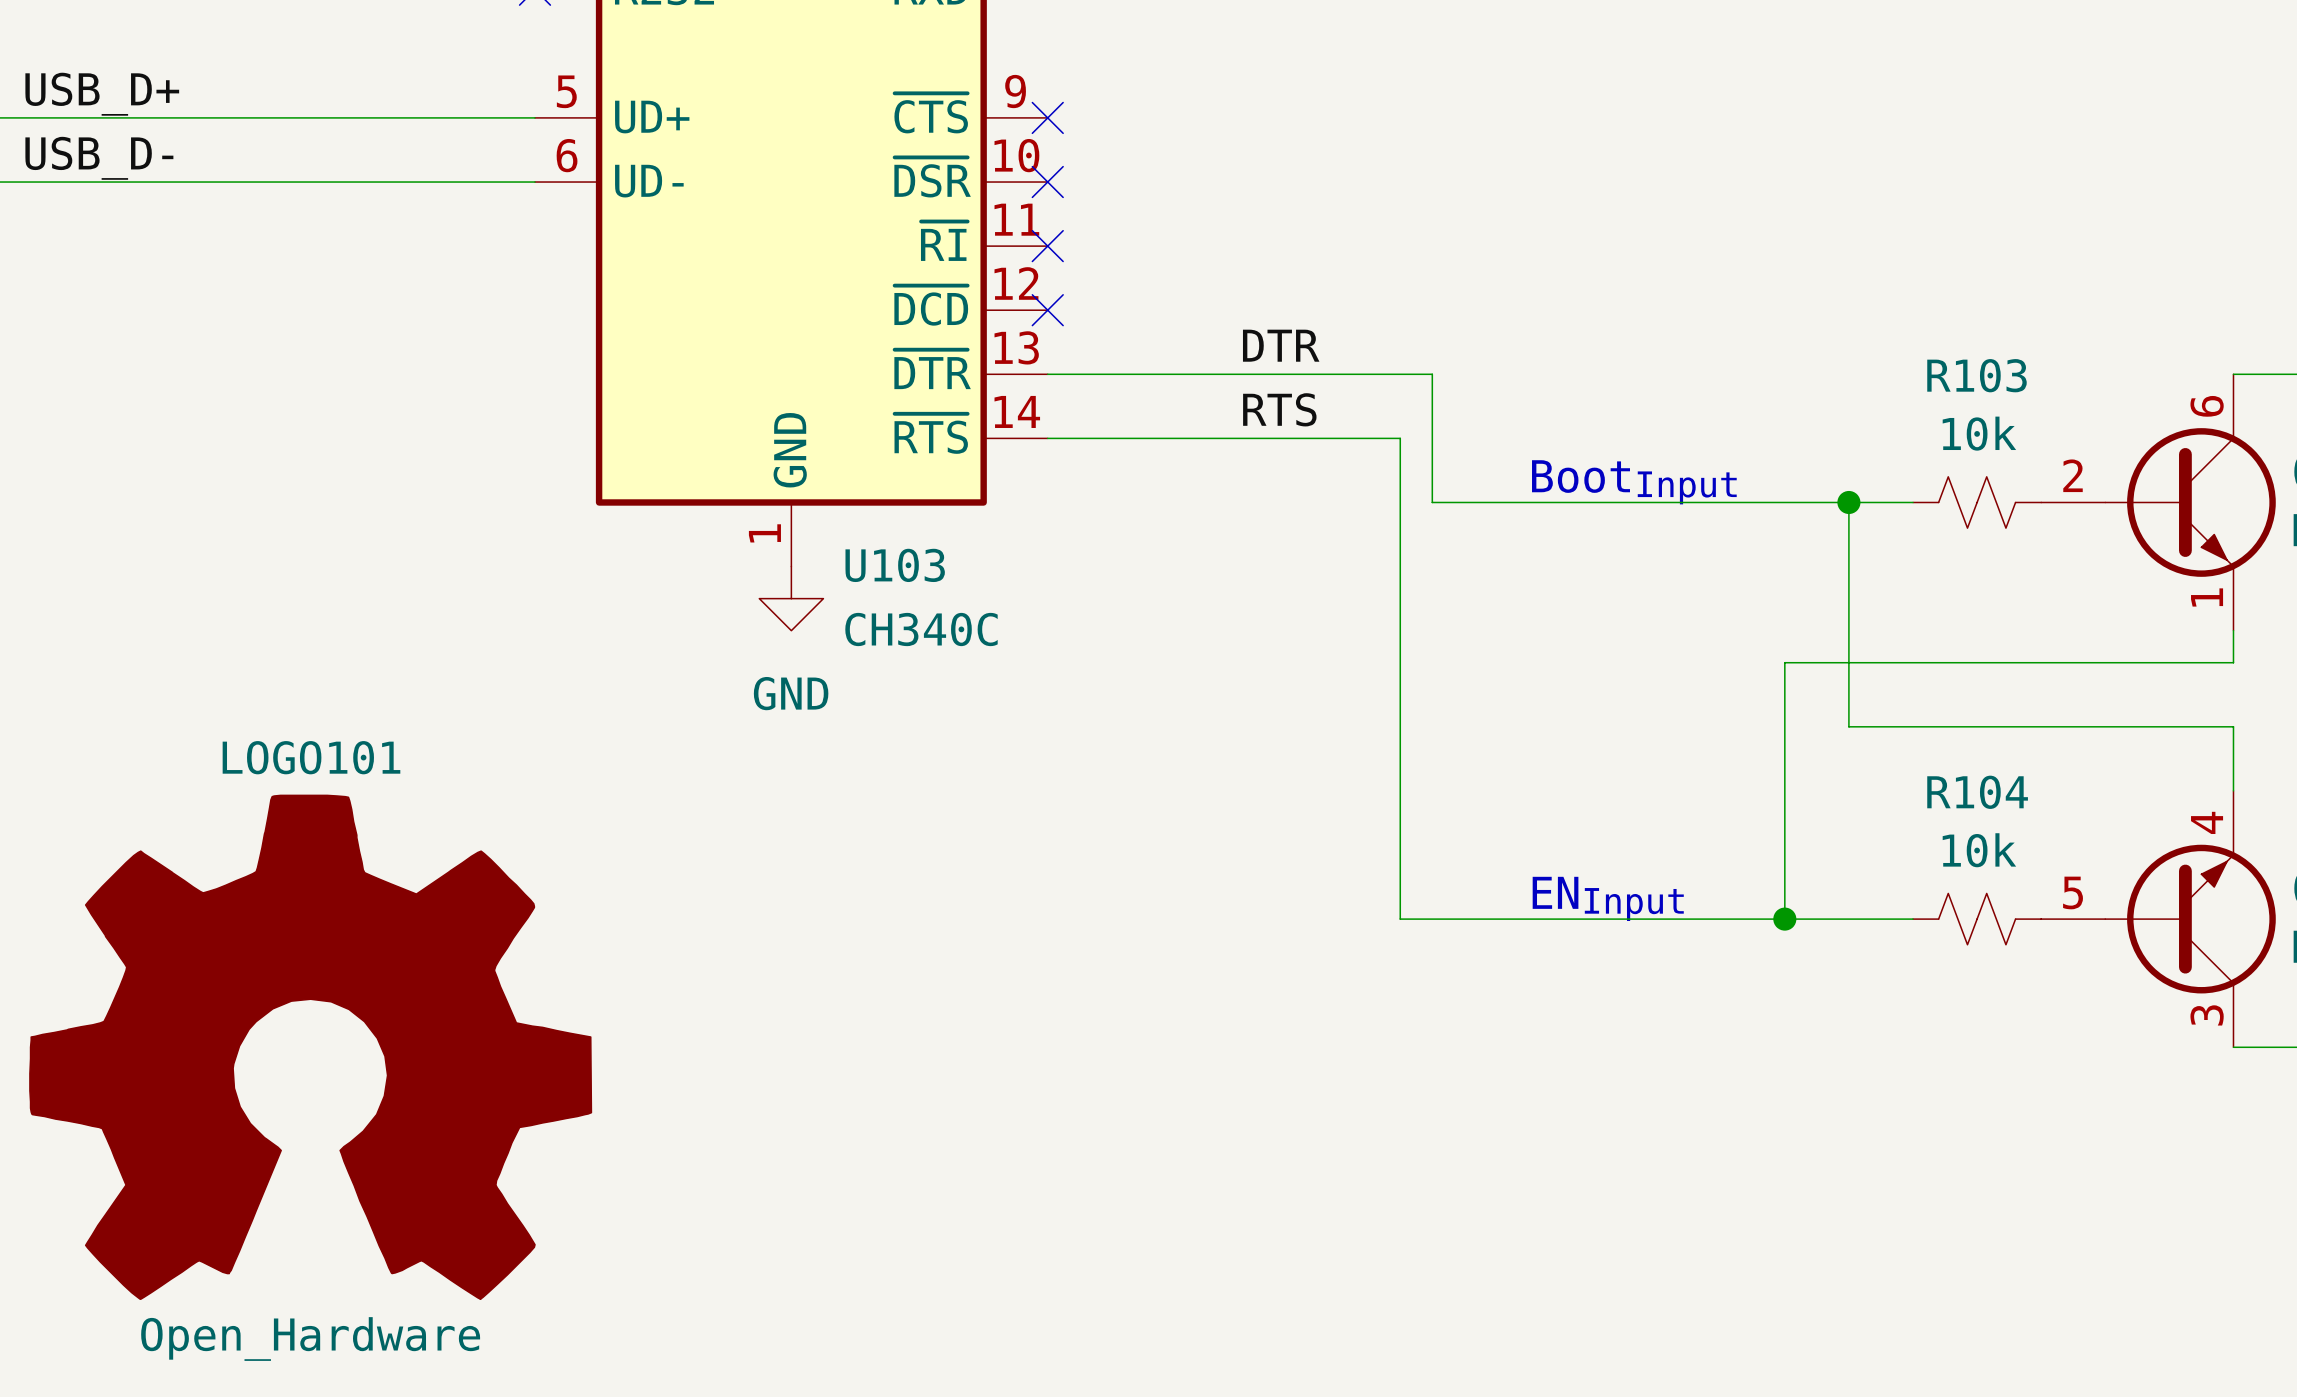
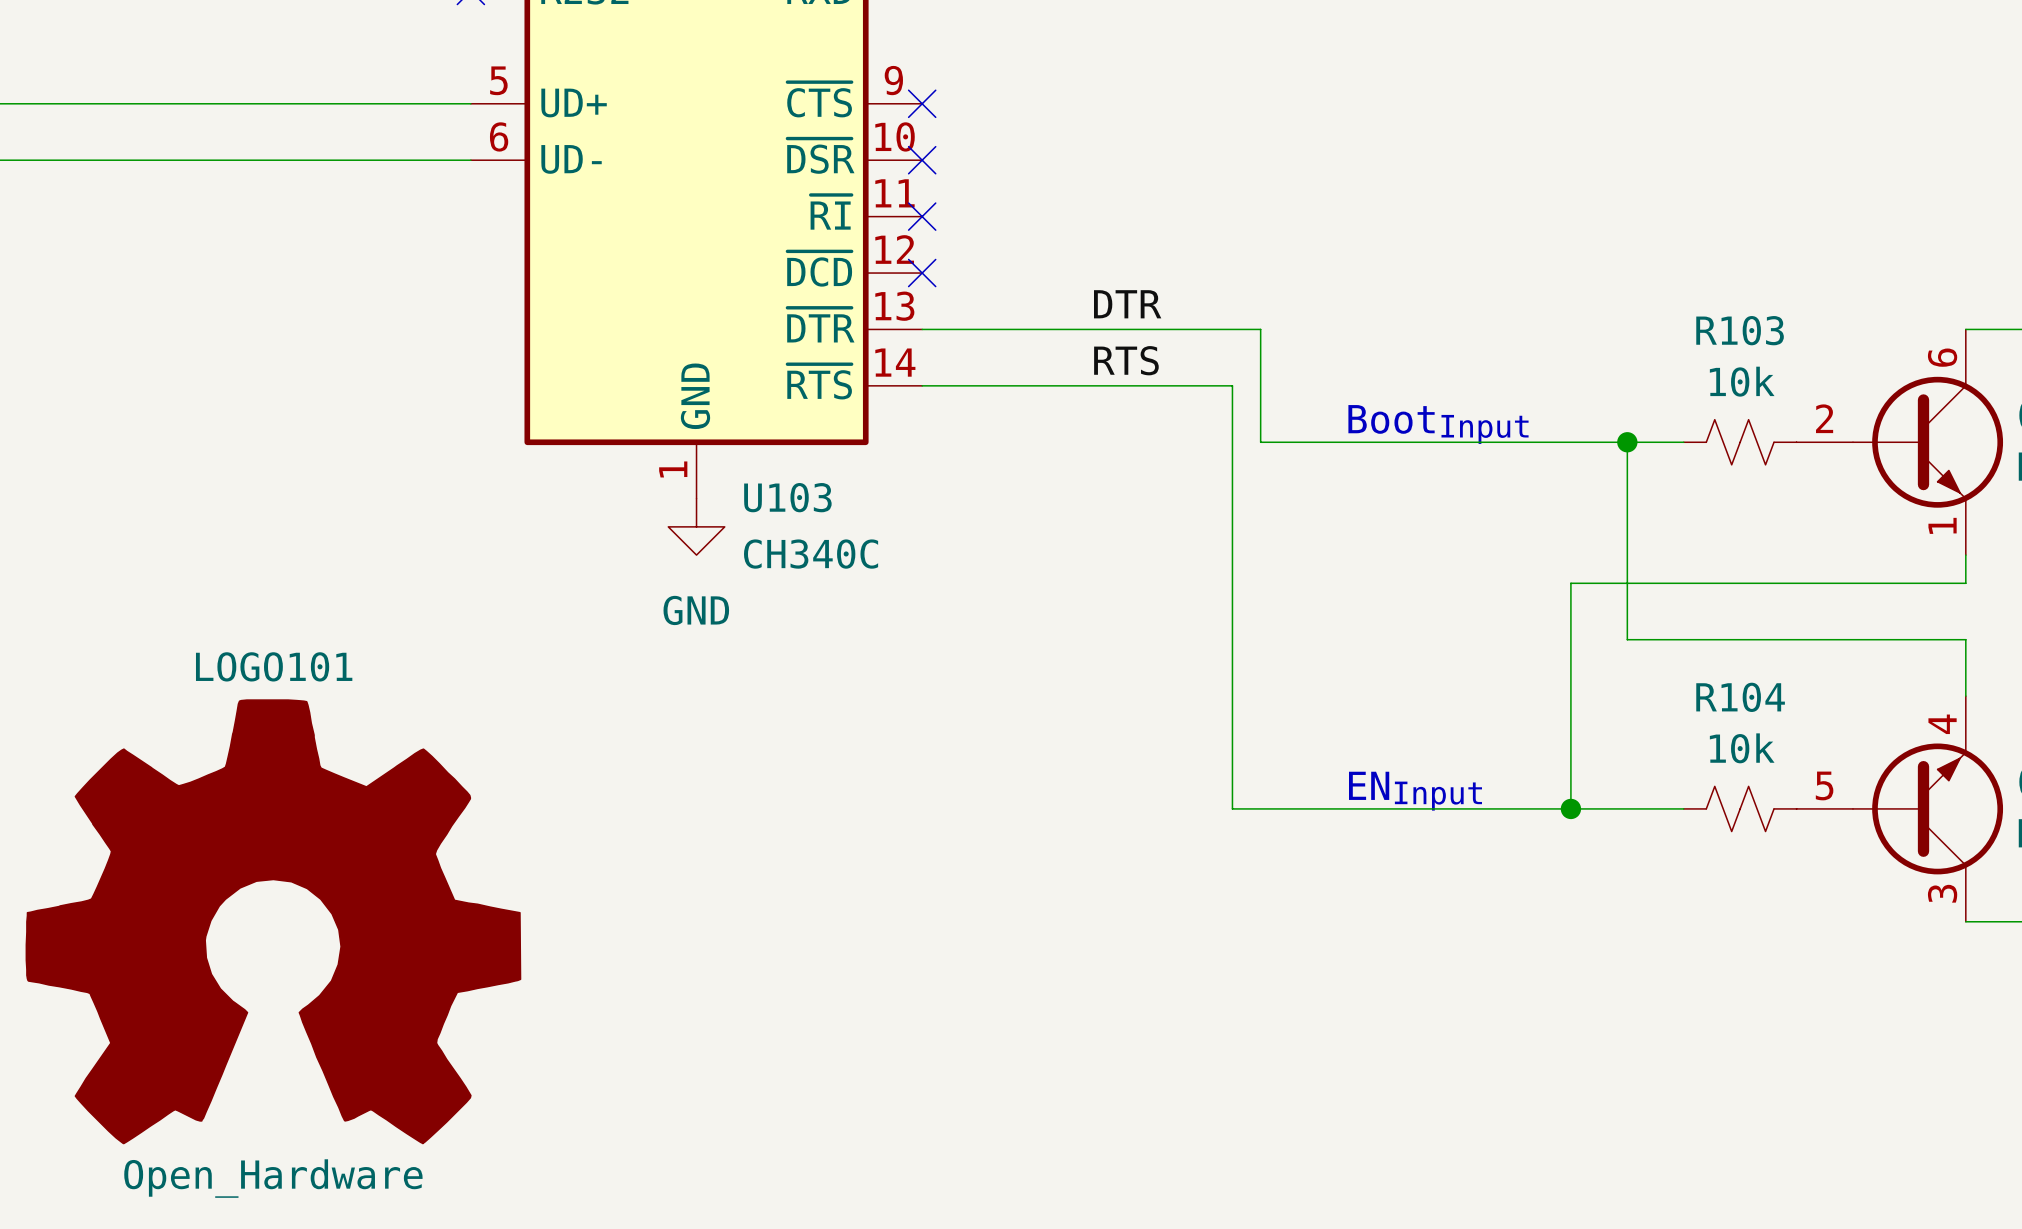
label: USB_D+ (102, 94) -> none
label: USB_D- (99, 158) -> none

